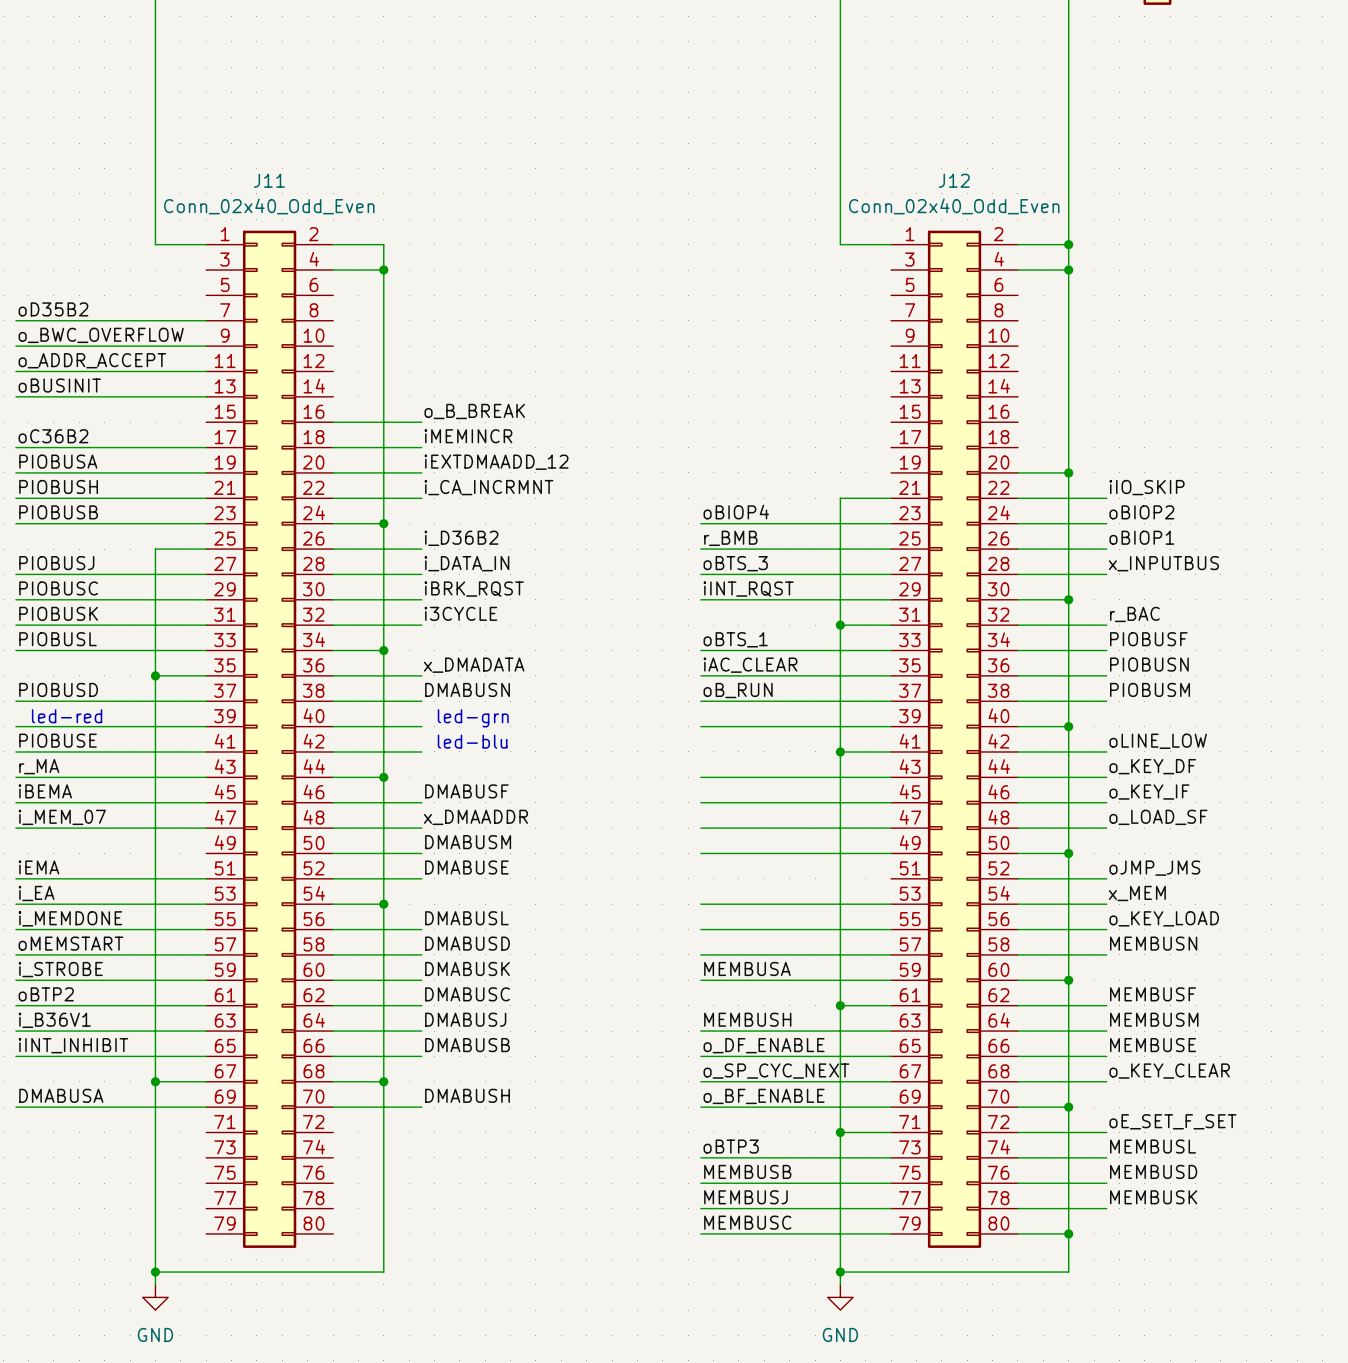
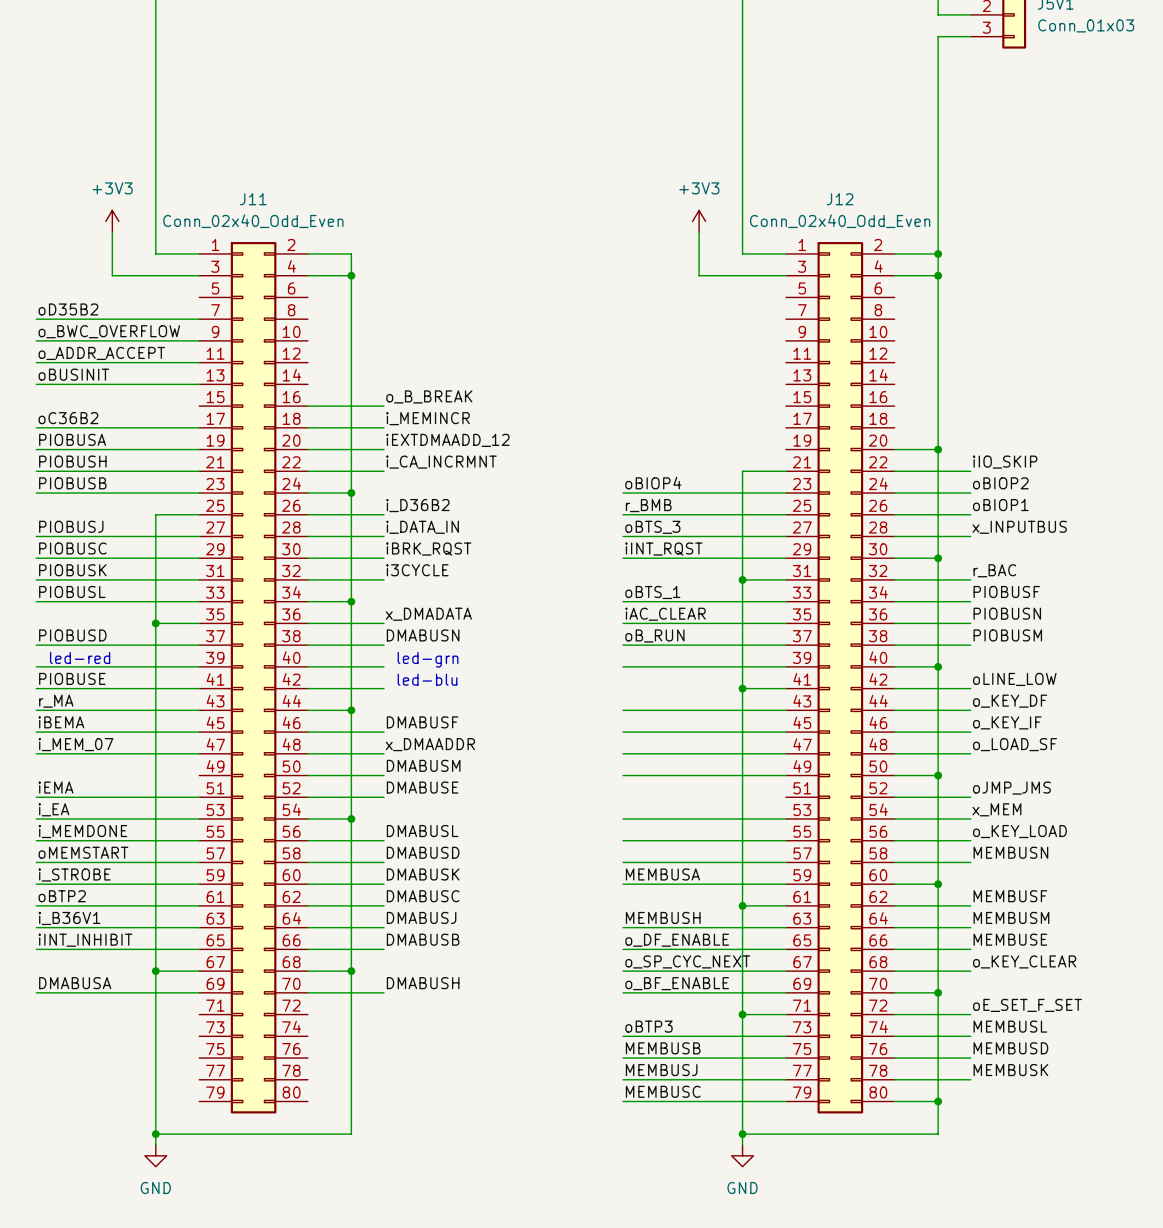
power symbol: none -> +3V3 (112, 221)
power symbol: none -> +3V3 (699, 221)
wire: none -> (112, 232) (112, 275) (199, 275)
wire: none -> (699, 232) (699, 275) (786, 275)
label: iMEMINCR (468, 436) -> i_MEMINCR (428, 418)

